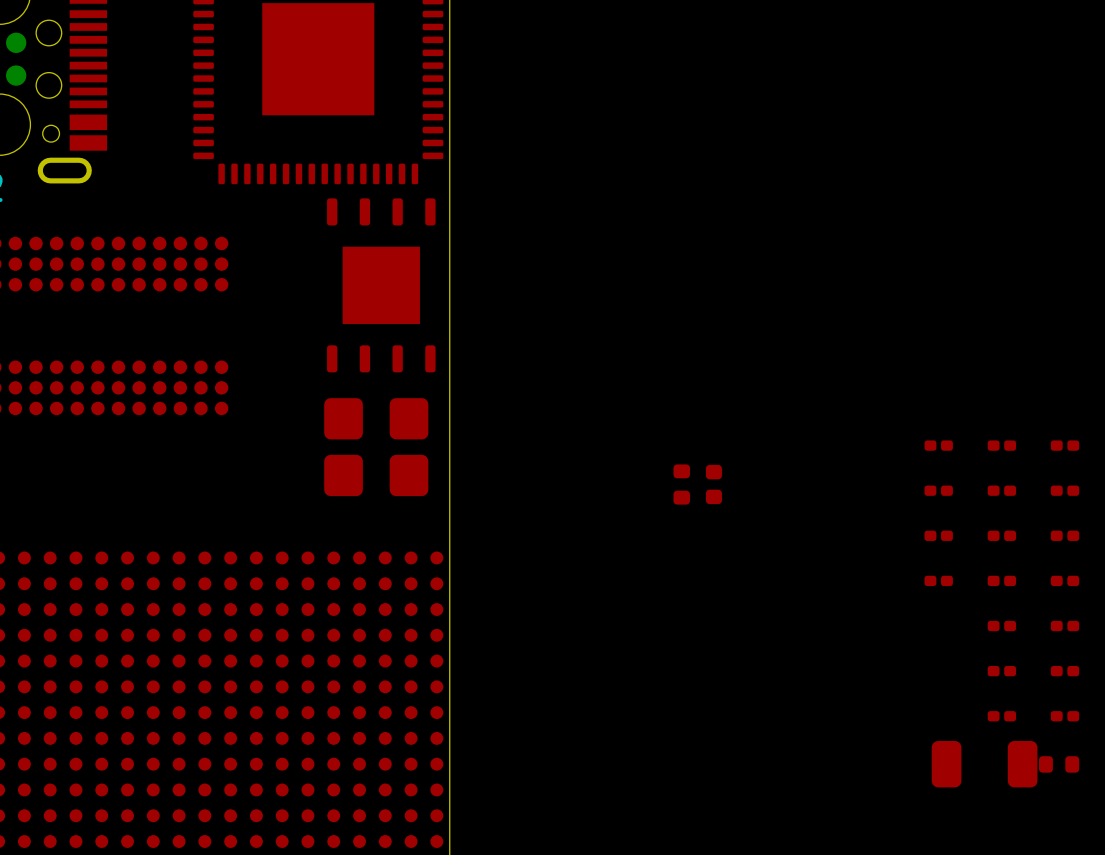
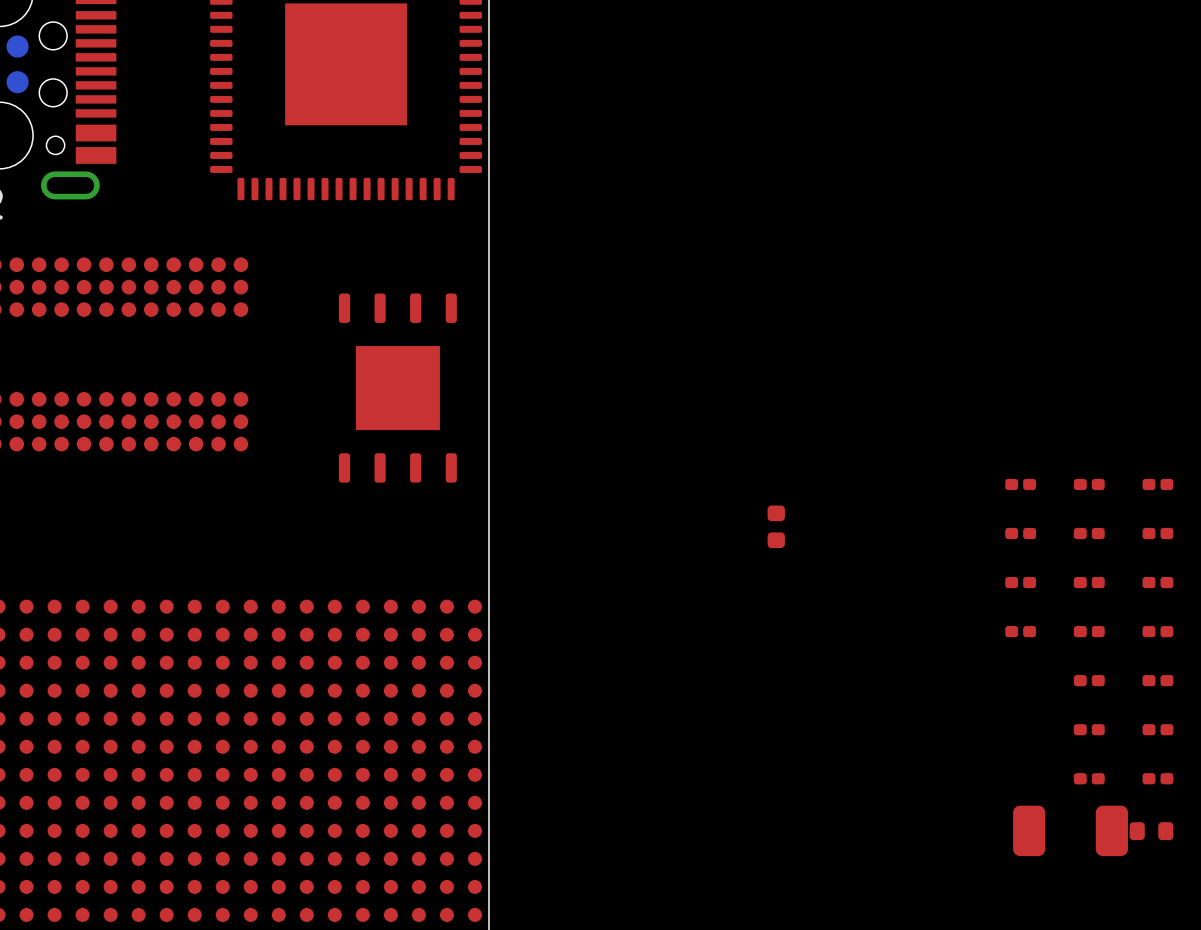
part position: (381, 285) -> (397, 388)
part: (376, 447) -> none
part: (681, 484) -> none

